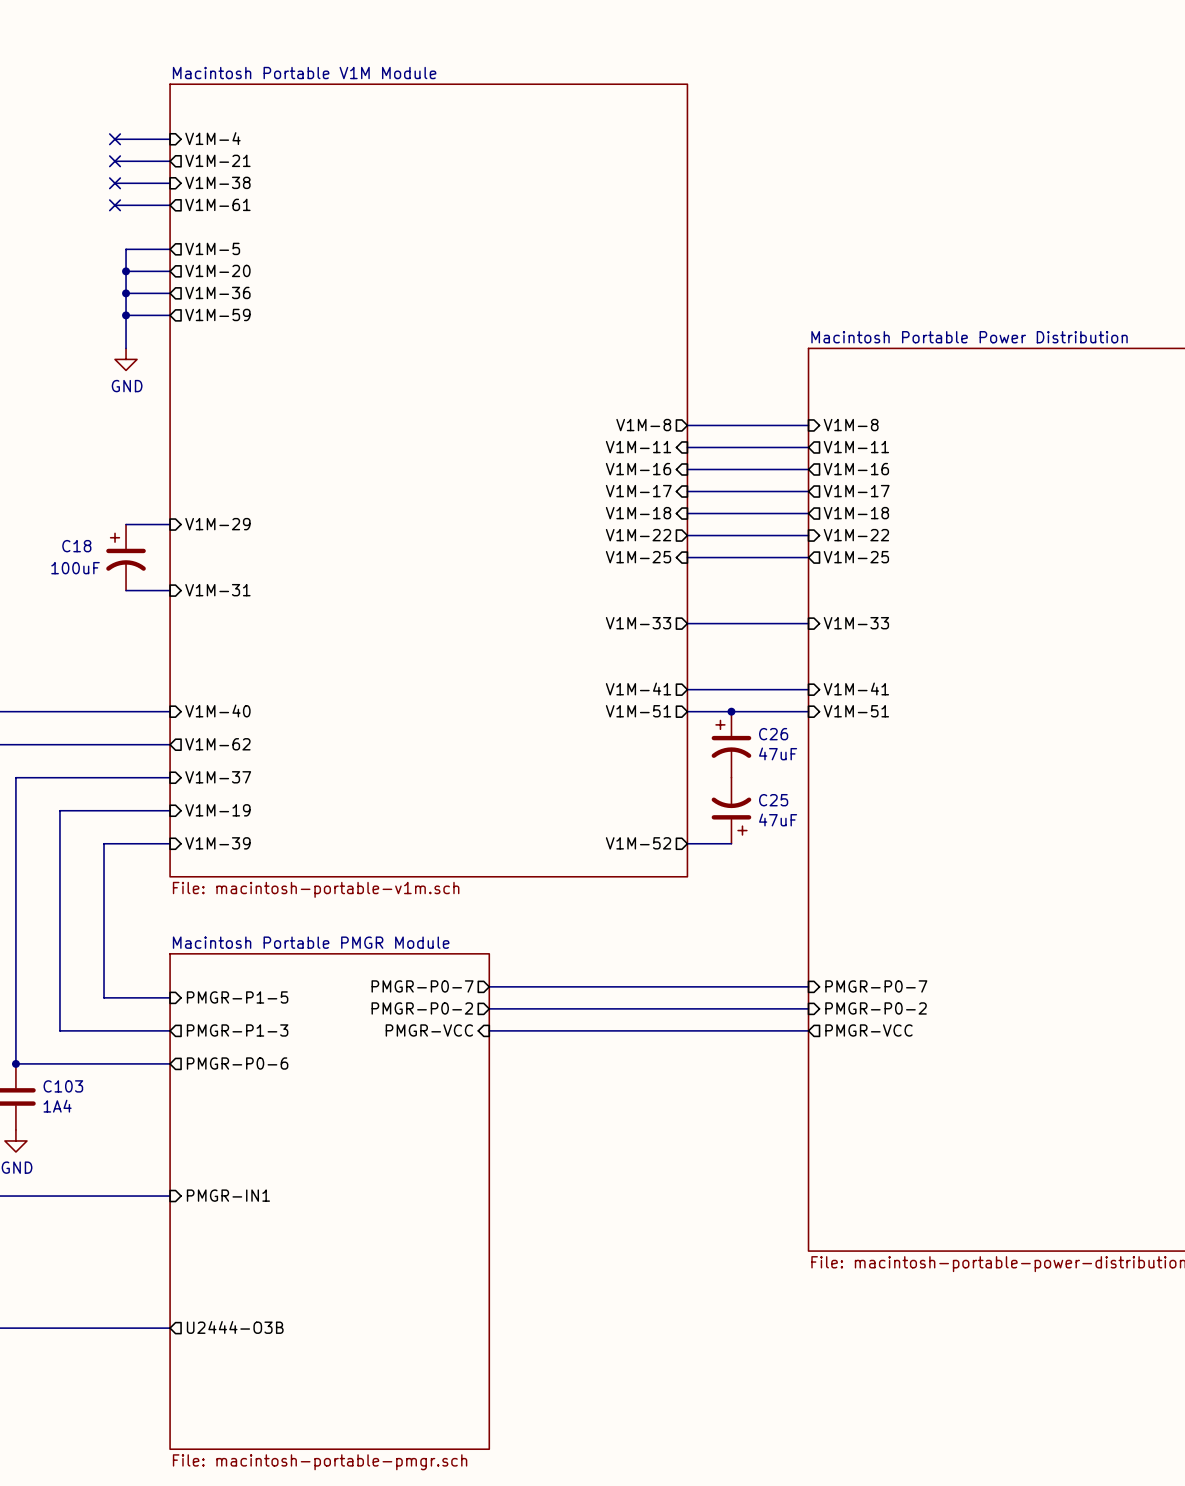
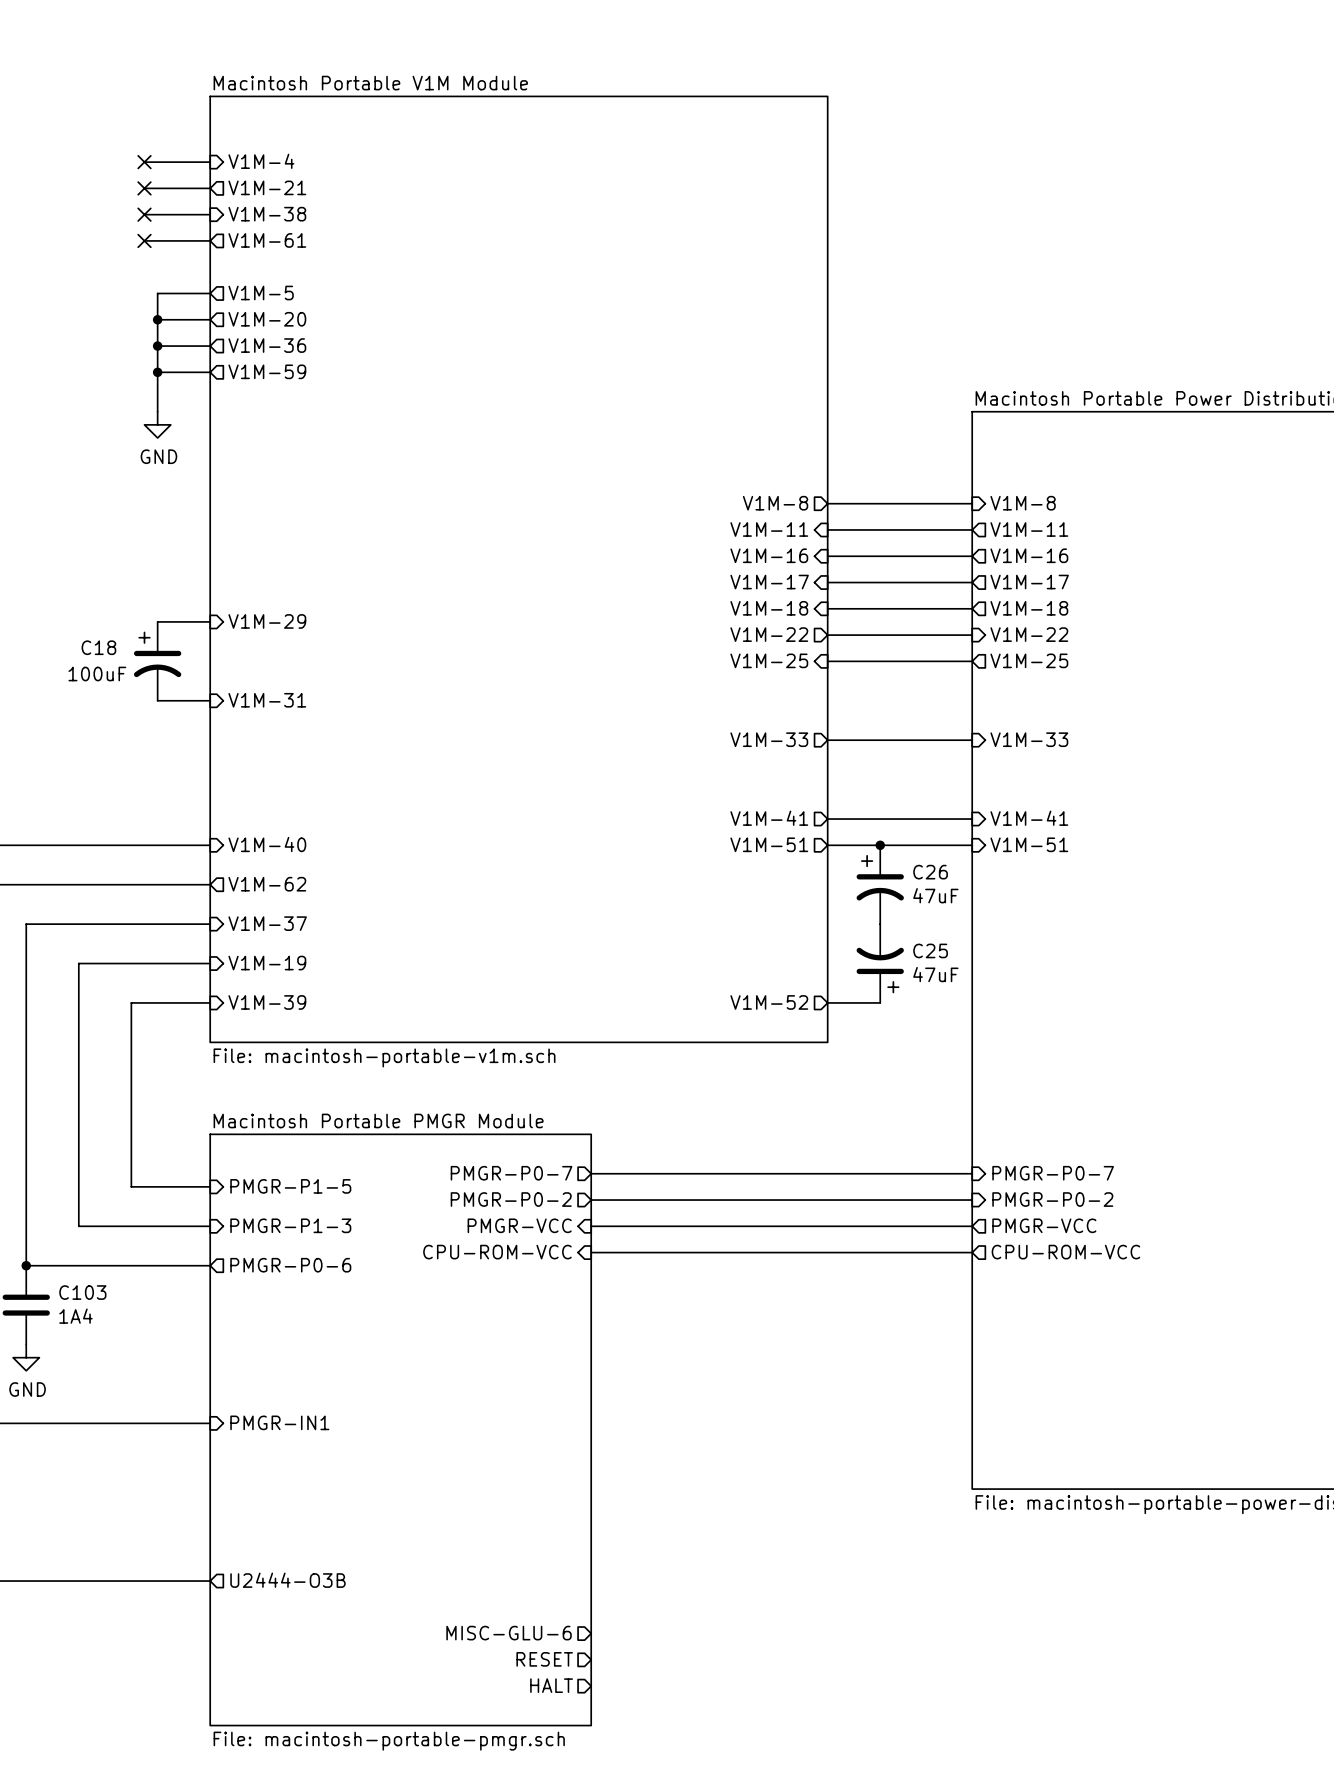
sheet pin shape: output (237, 1030) -> input (290, 1225)
sheet pin: none -> CPU-ROM-VCC (497, 1252)
wire: none -> (591, 1252) (972, 1252)
sheet pin: none -> CPU-ROM-VCC (1065, 1252)
sheet pin: none -> MISC-GLU-6 (509, 1633)
sheet pin: none -> RESET (544, 1659)
sheet pin: none -> HALT (551, 1685)

